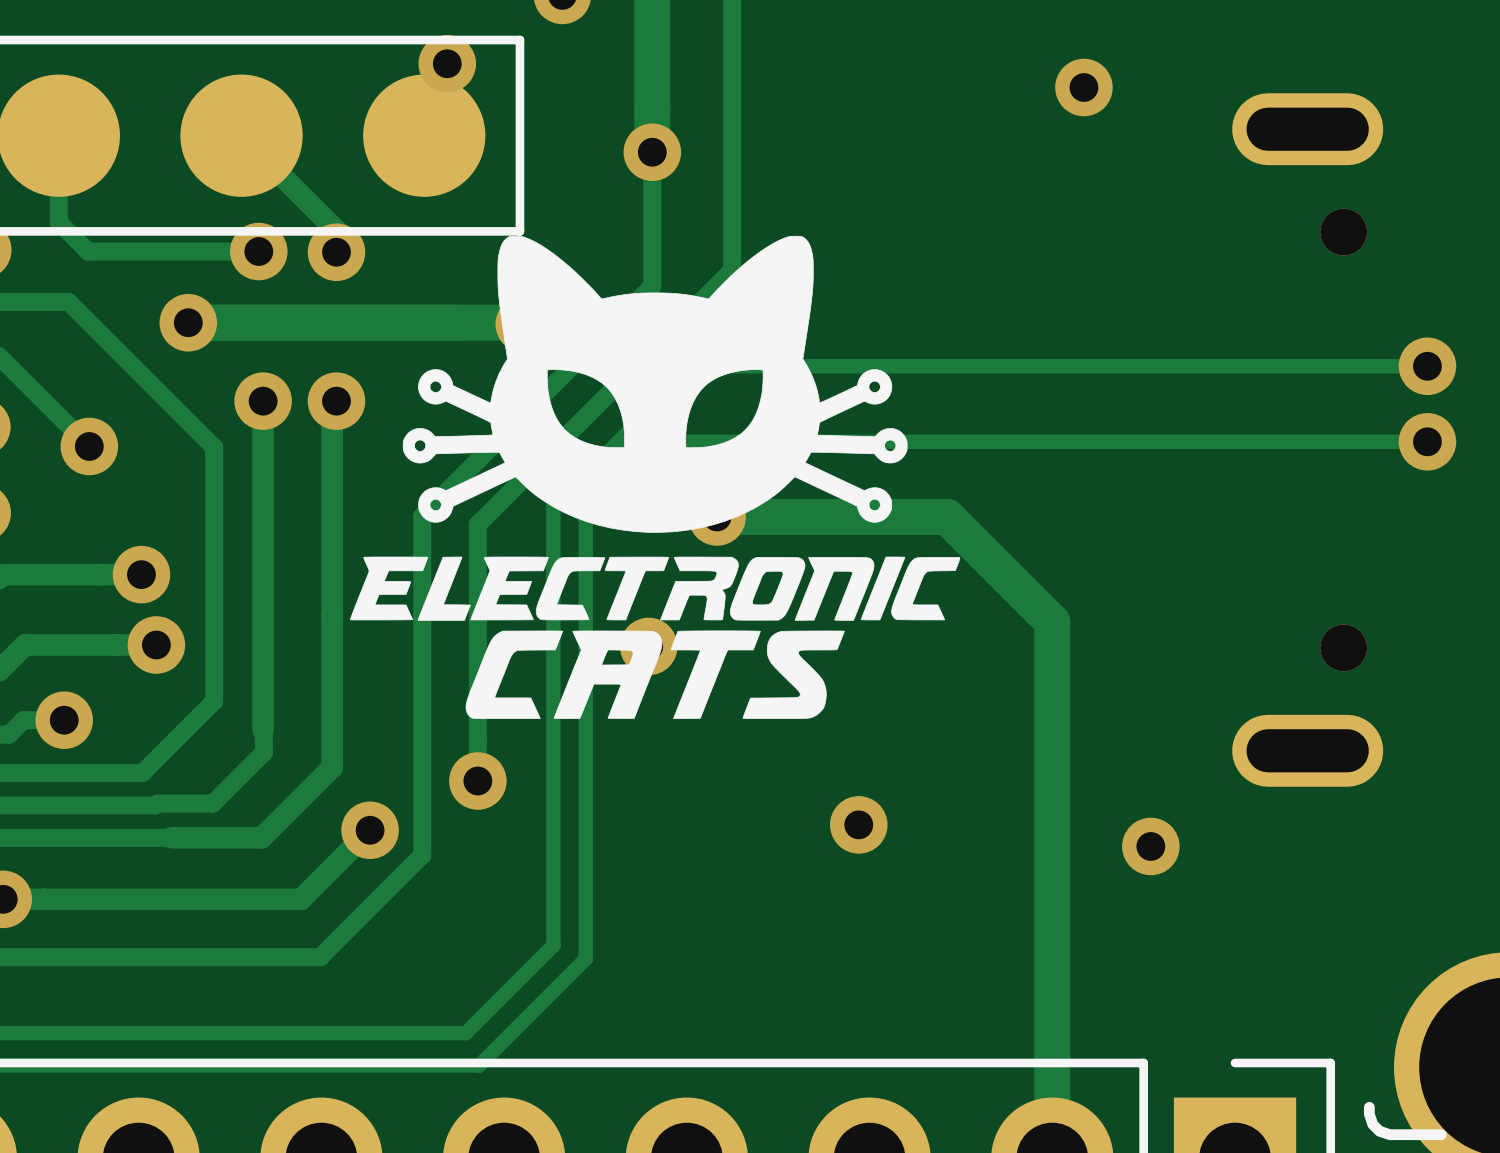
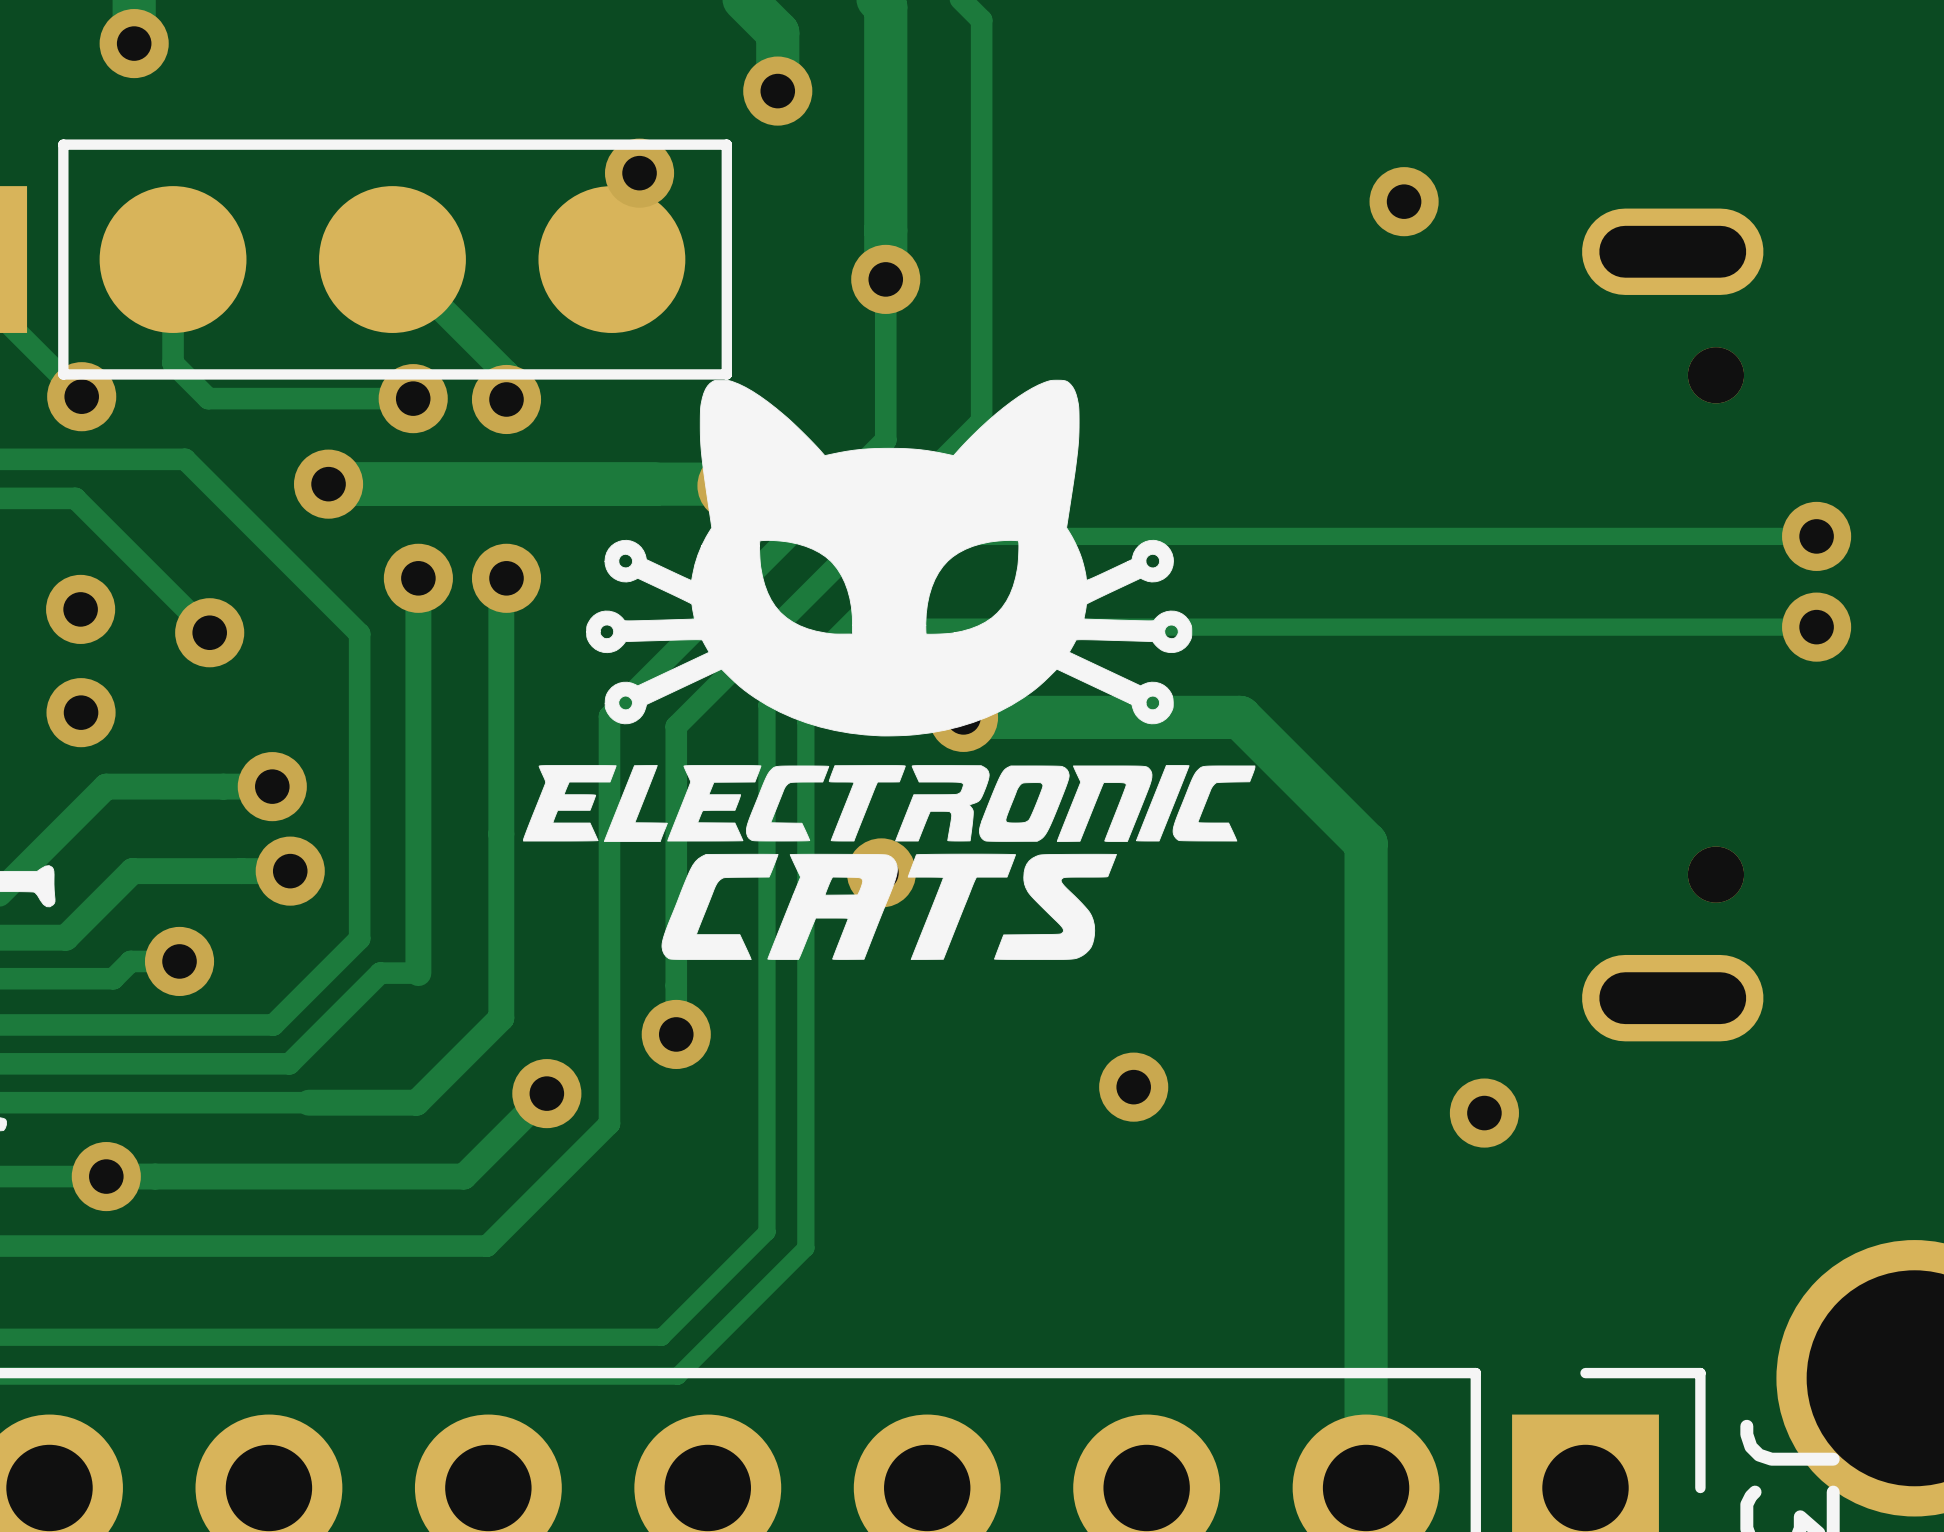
track: (263, 731) (263, 752) (212, 803) (157, 803) -> (418, 973) (380, 973) (291, 1061)

